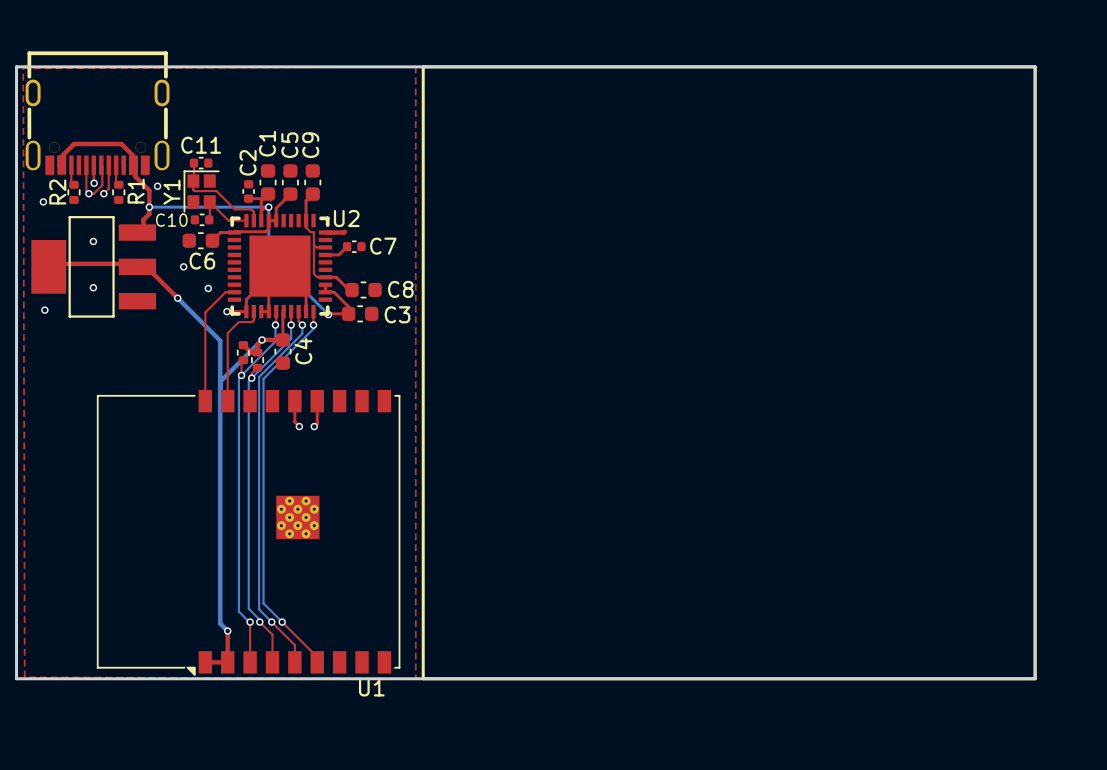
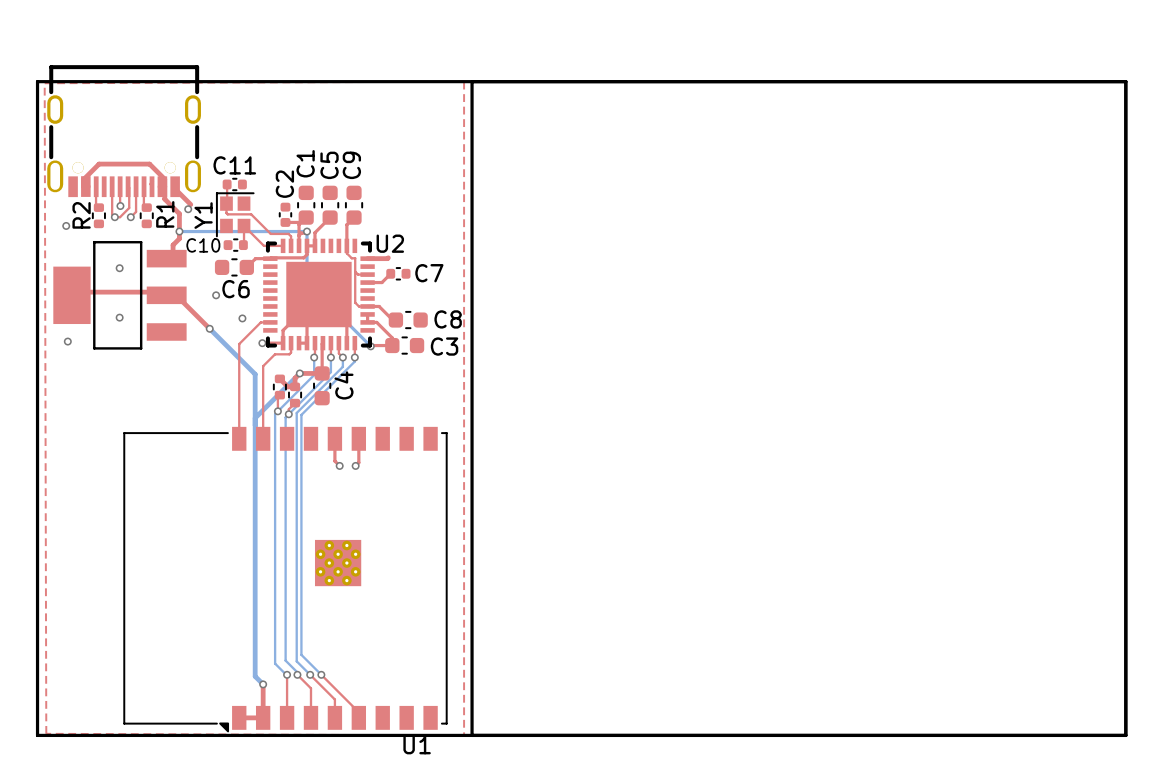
top track: none -> (176, 189) (190, 204)

